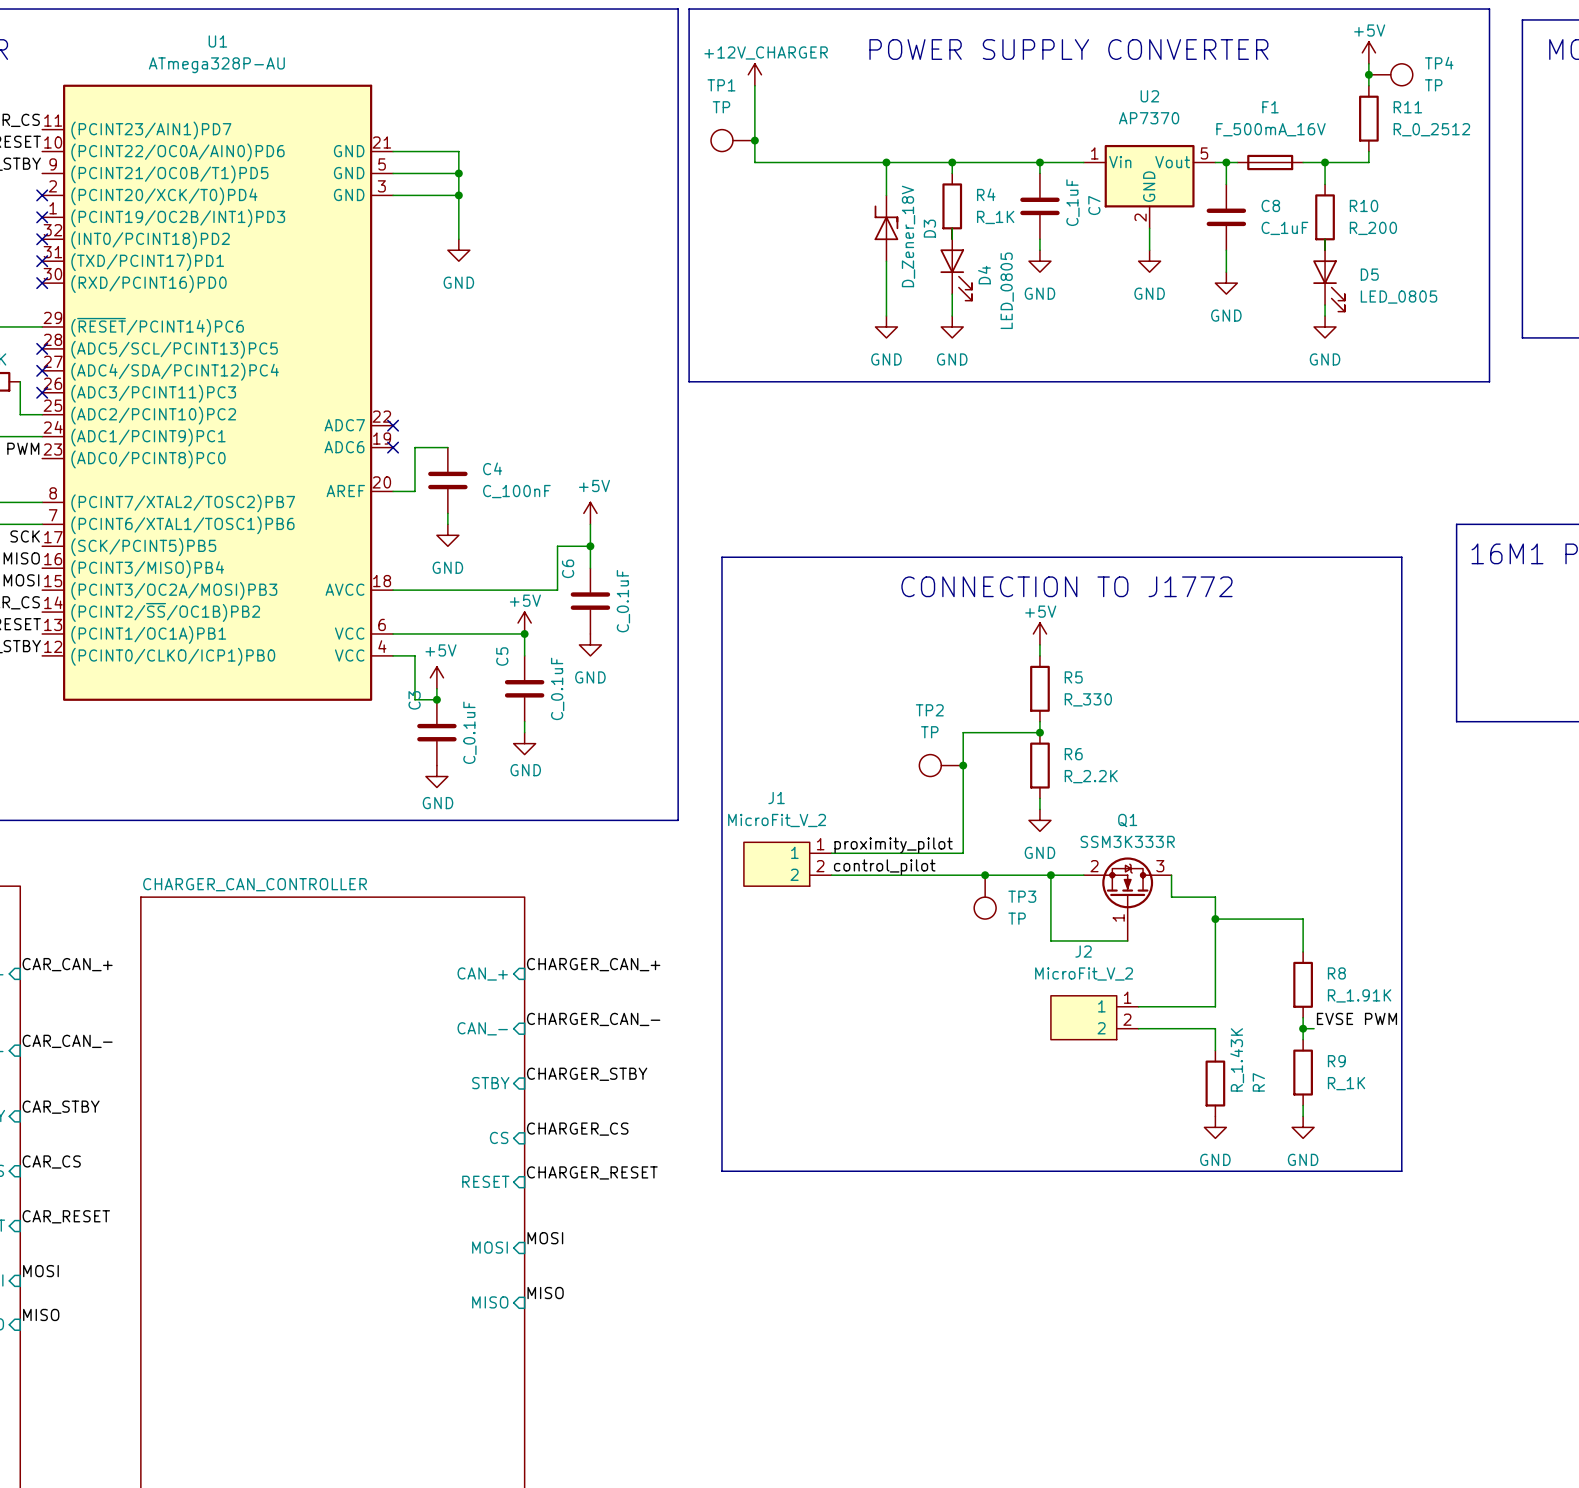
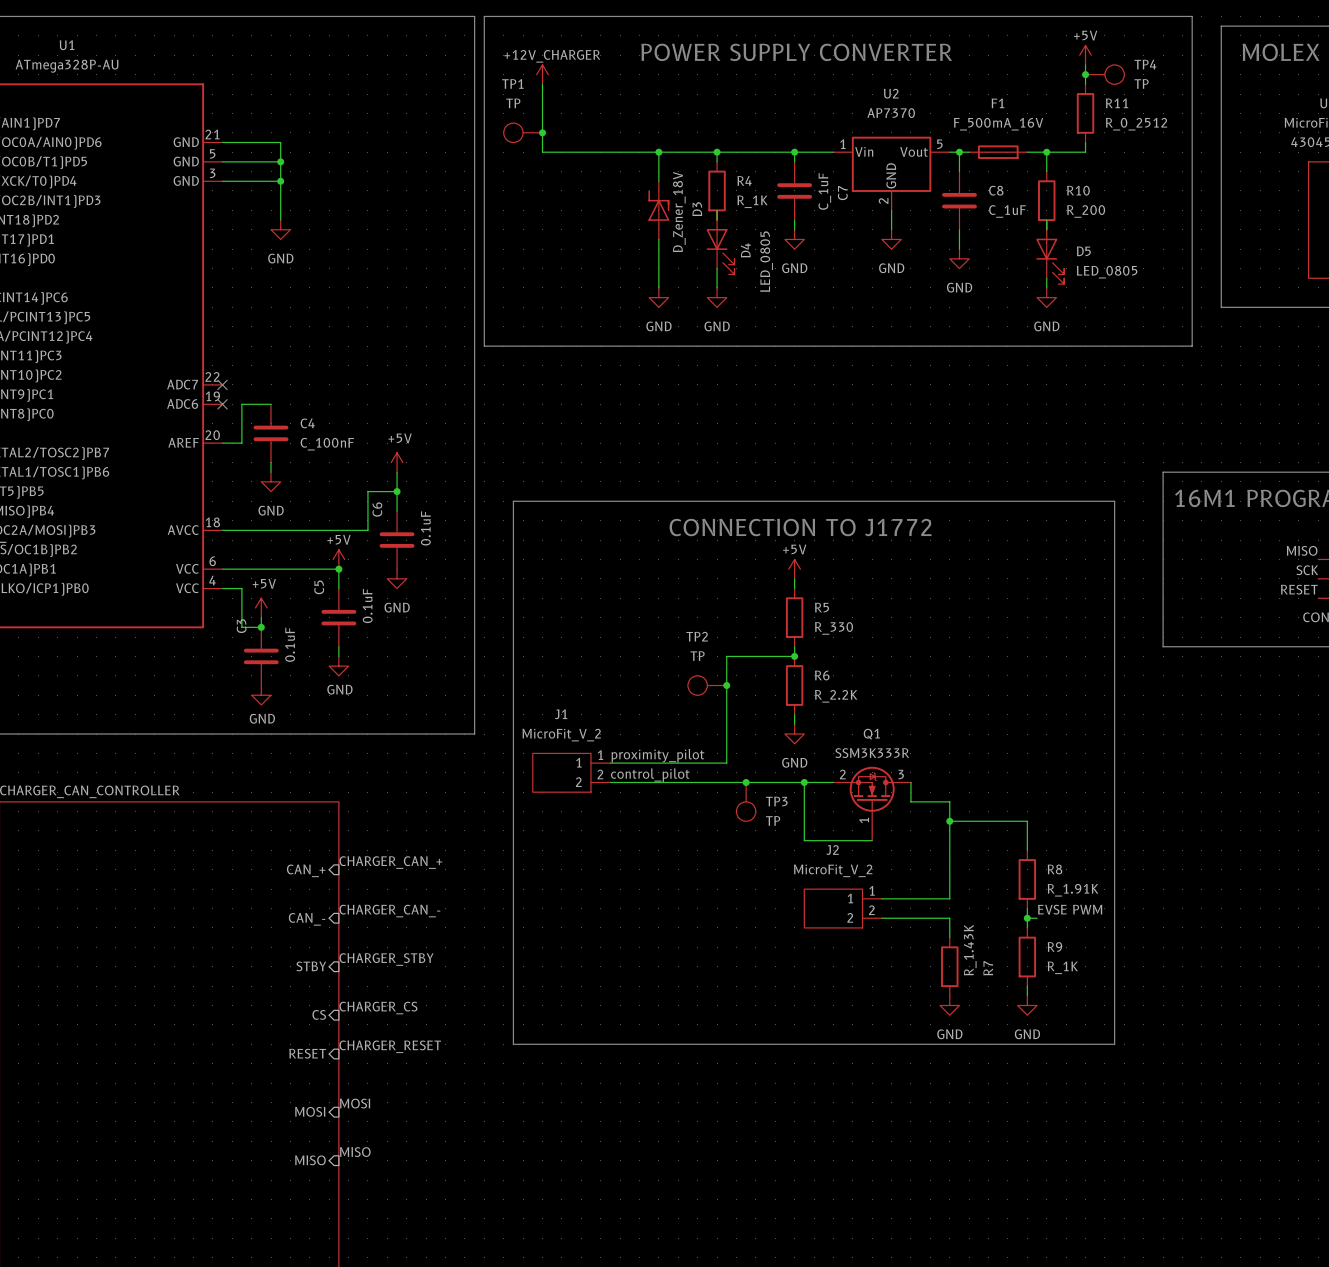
C6 value: C_0.1uF (623, 601) -> 0.1uF (425, 528)
C5 value: C_0.1uF (557, 688) -> 0.1uF (367, 605)
C3 value: C_0.1uF (469, 732) -> 0.1uF (290, 644)

